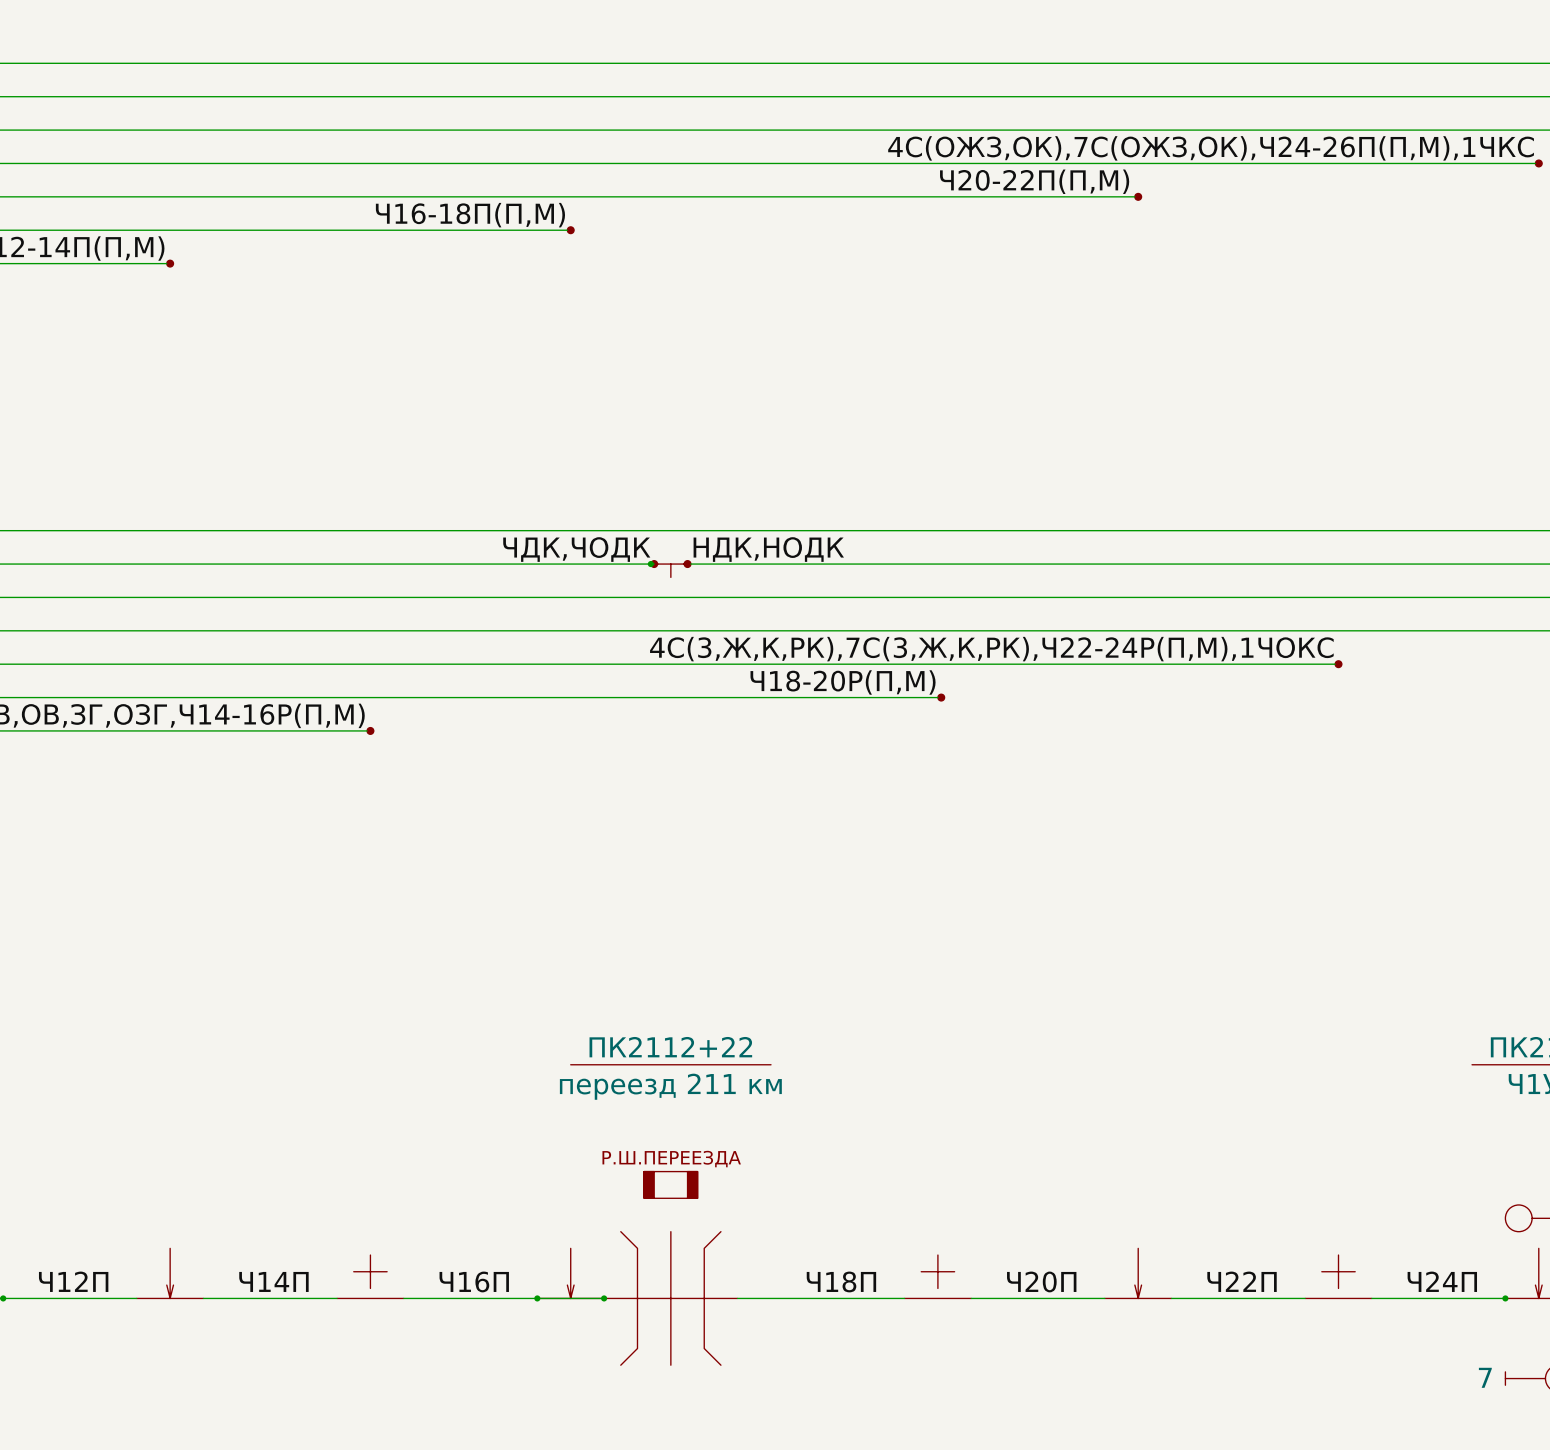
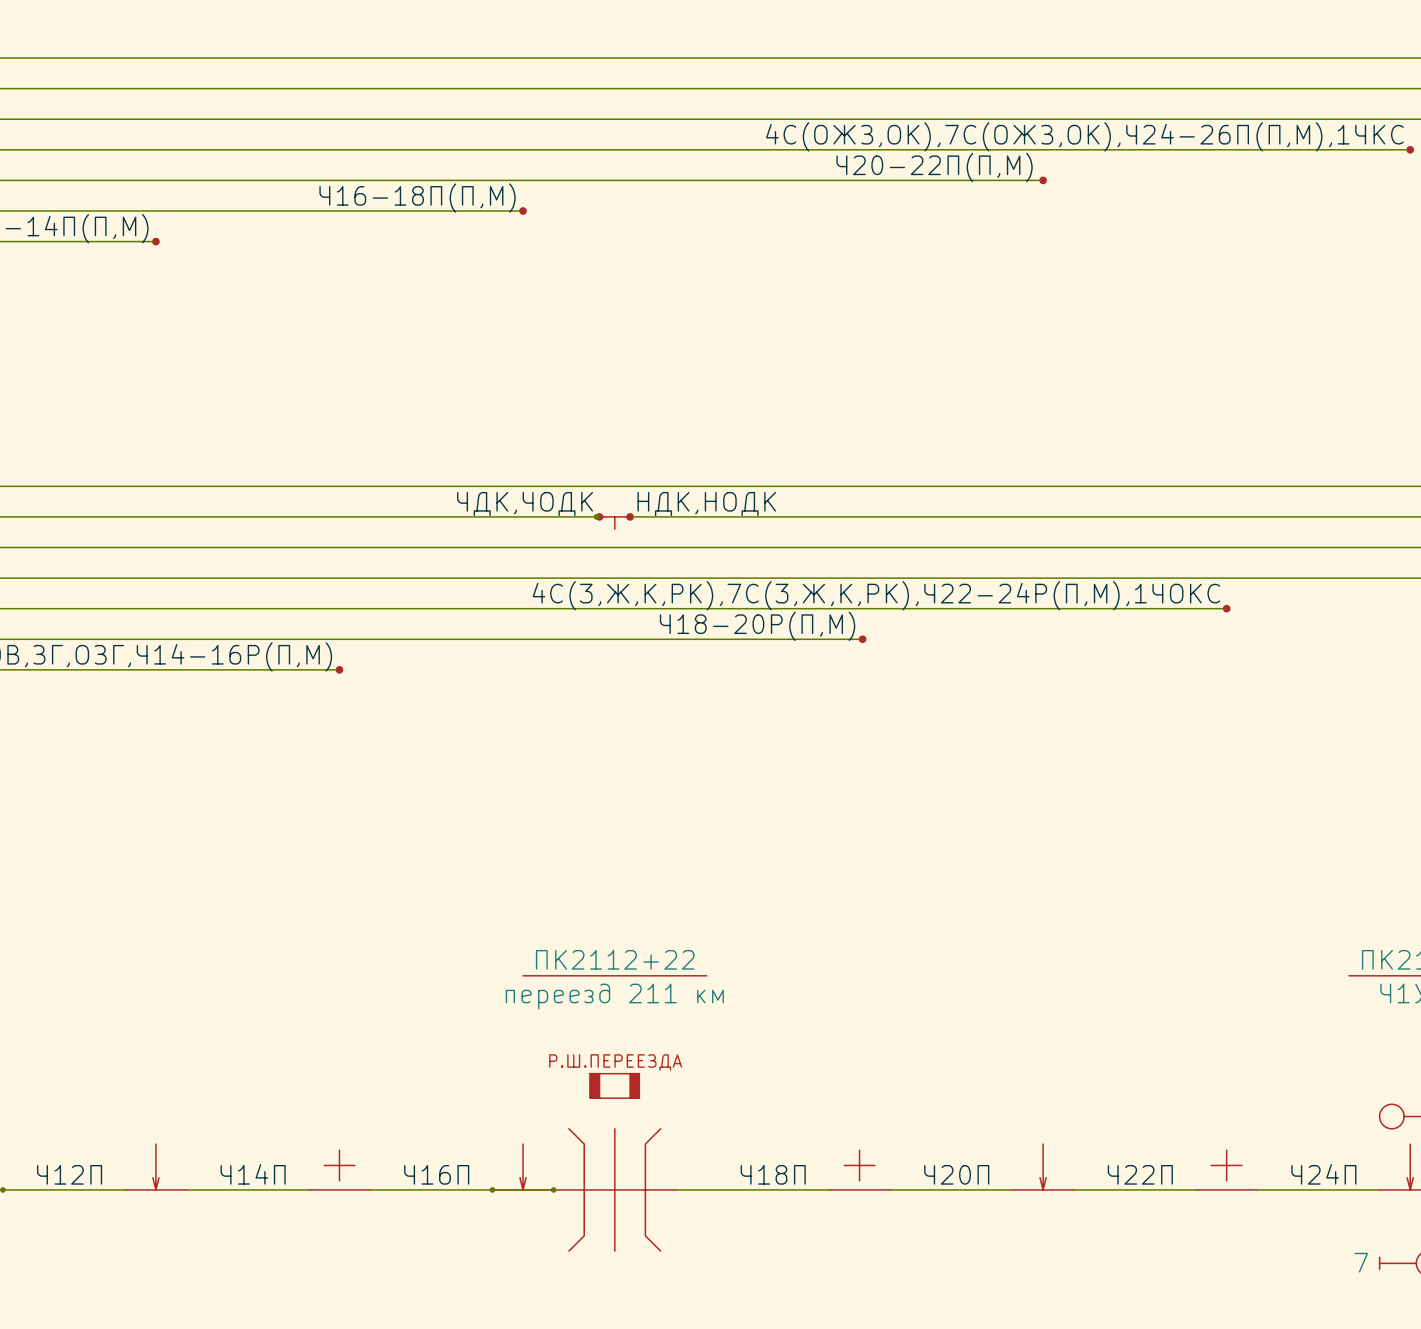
junction: (1505, 1298) -> none

